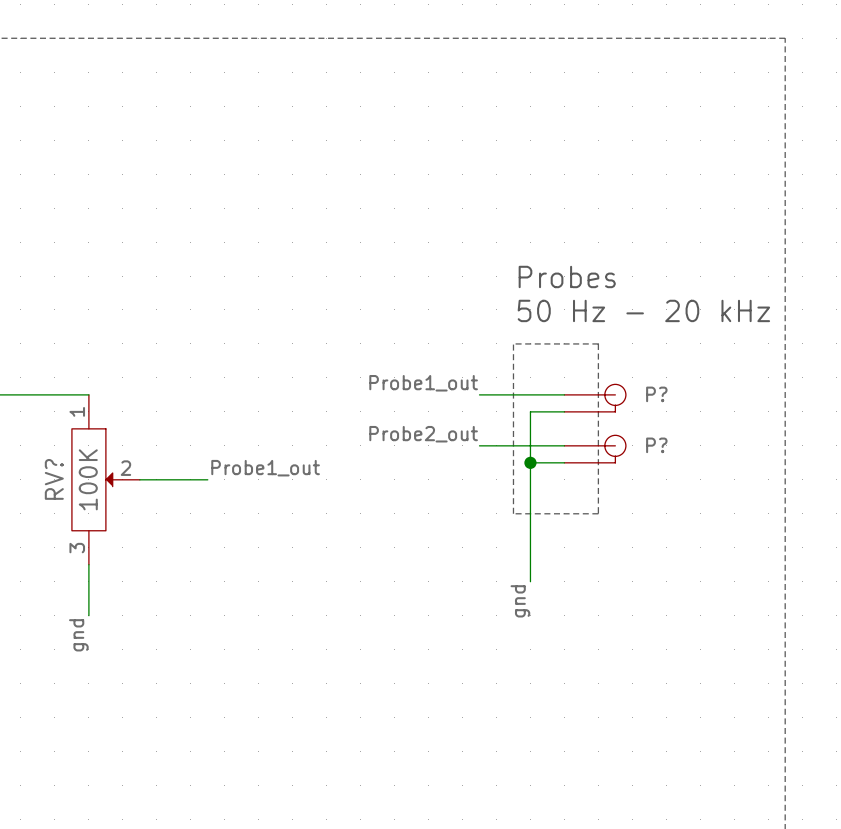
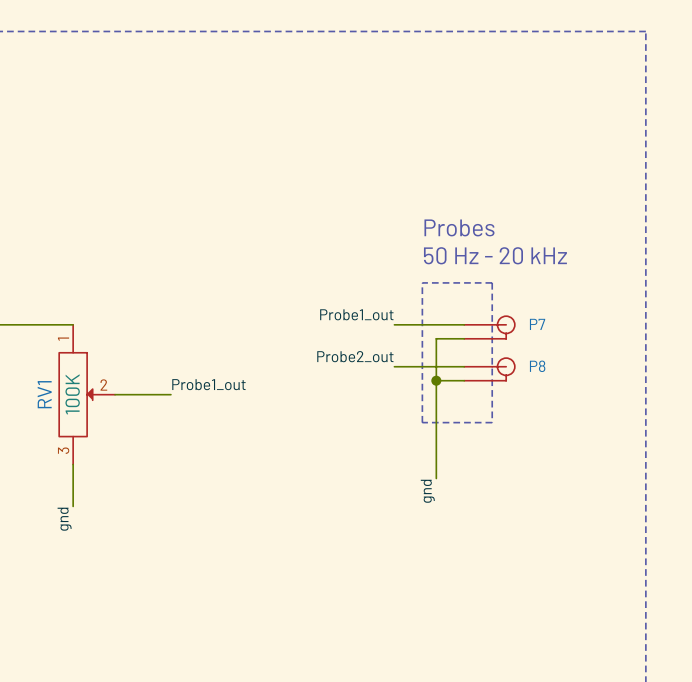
P? name: P? (656, 394) -> P7 (537, 324)
P? name: P? (656, 445) -> P8 (537, 366)
RV? name: RV? (54, 479) -> RV1 (44, 394)

